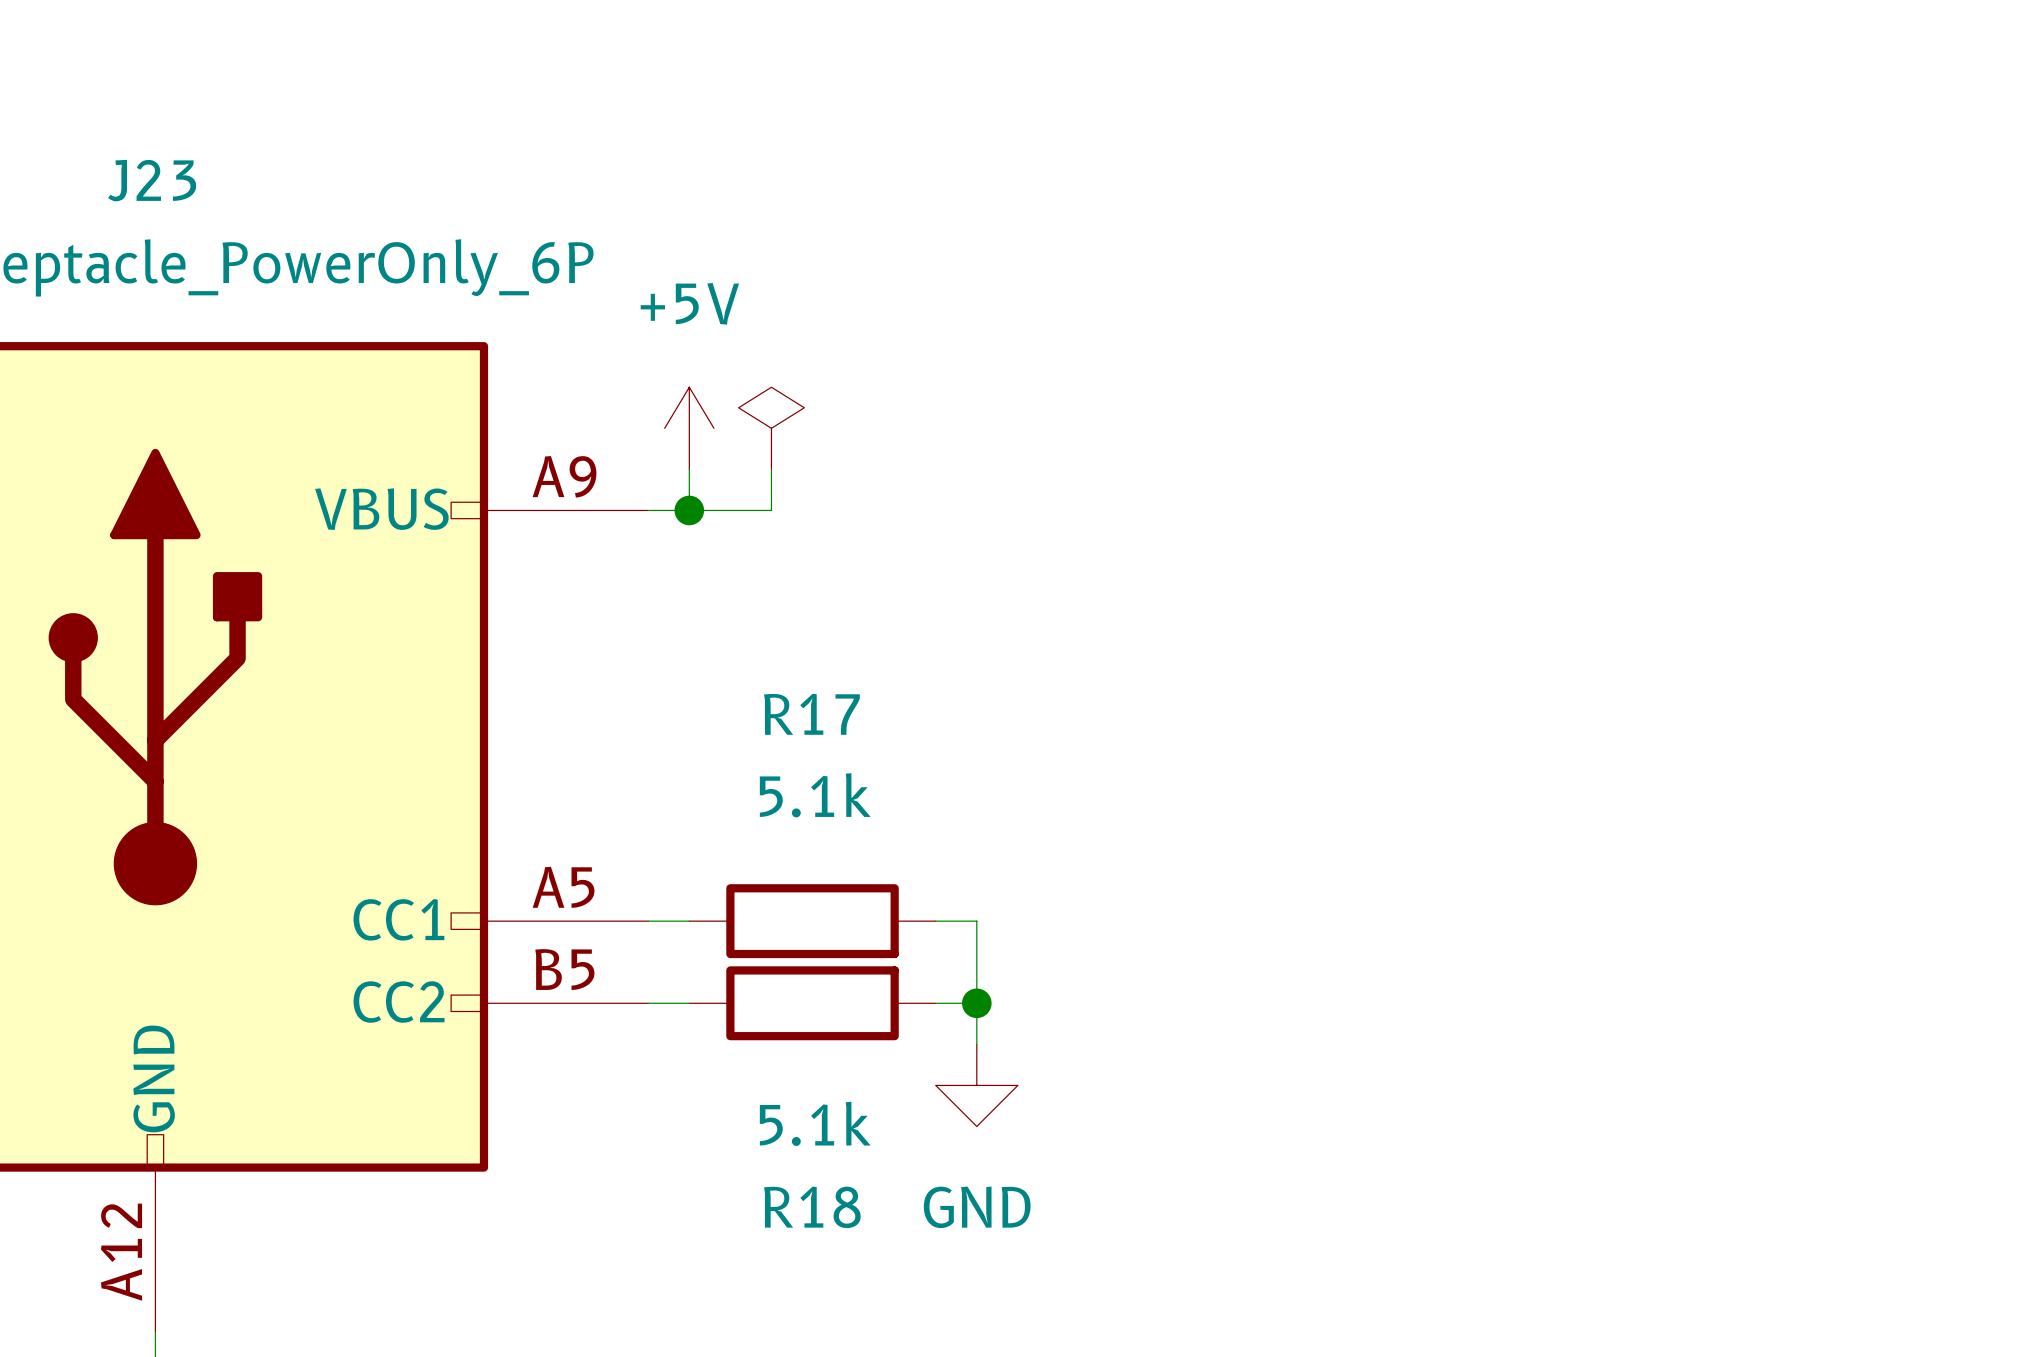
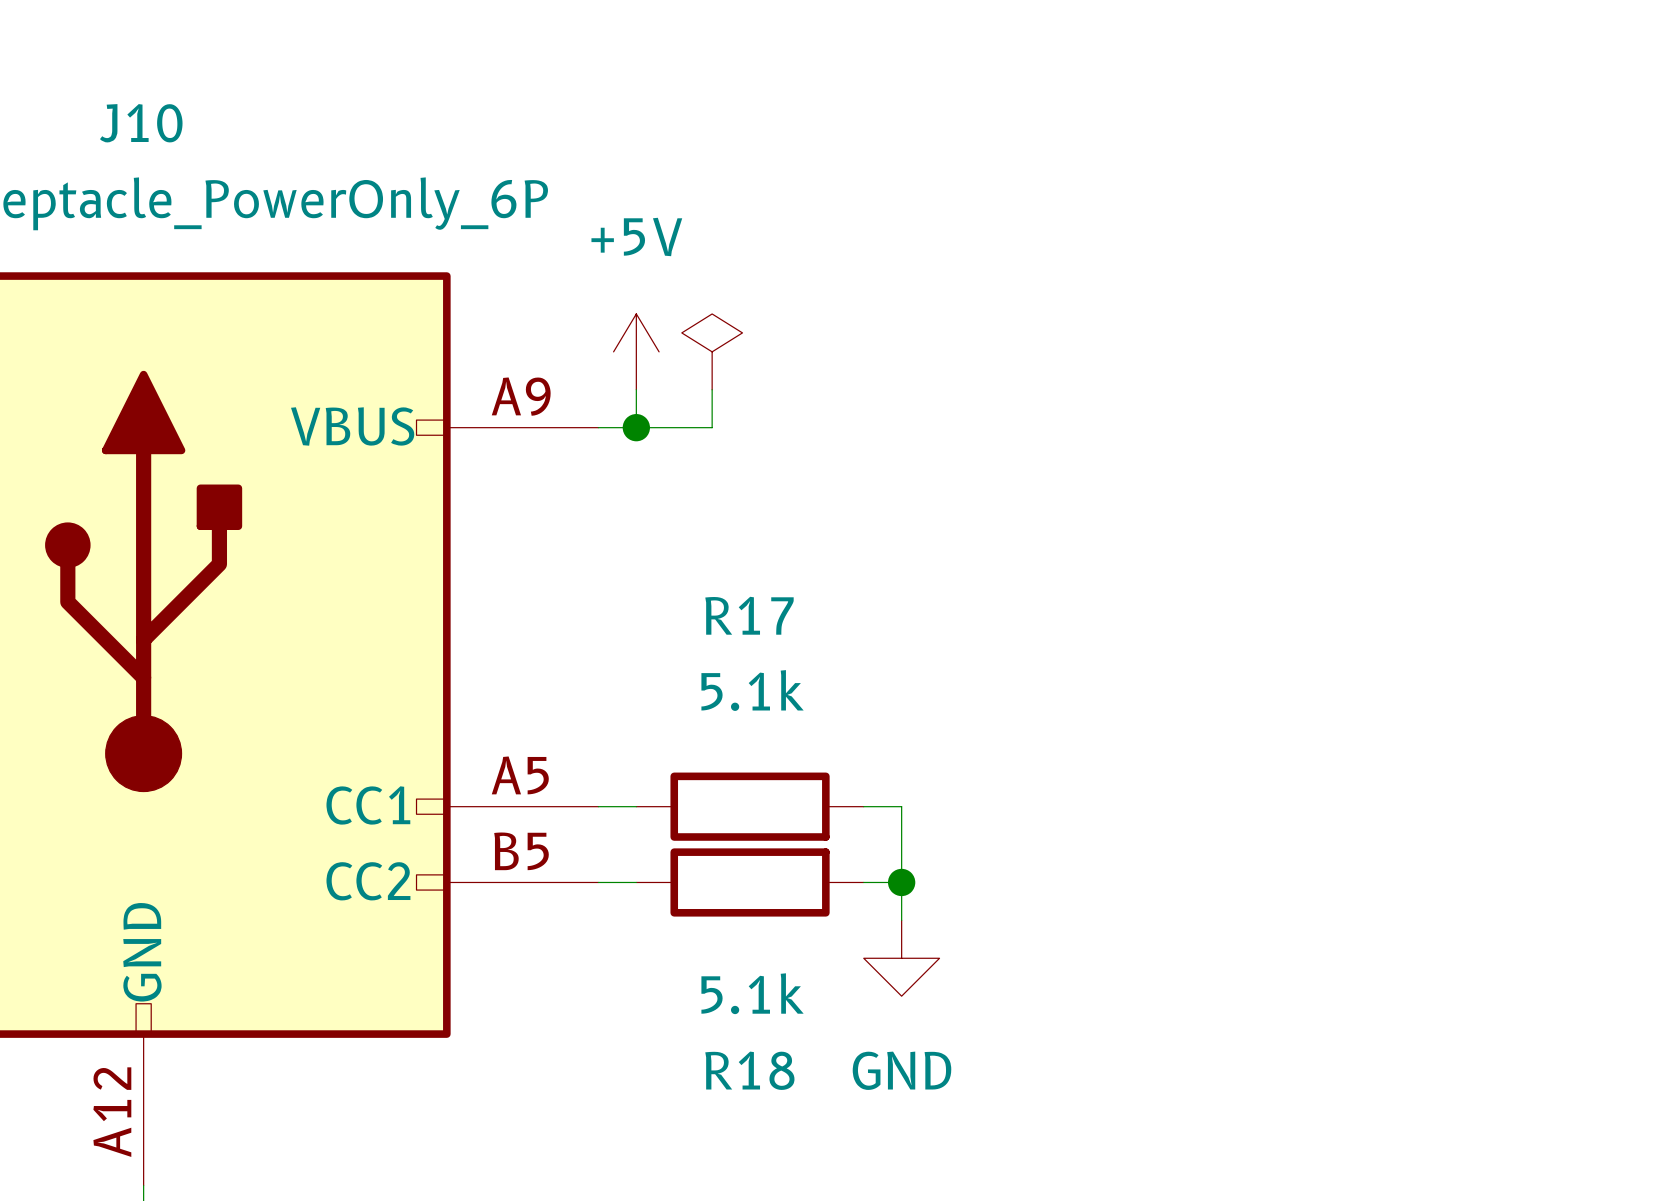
J23 name: J23 (152, 180) -> J10 (141, 123)

